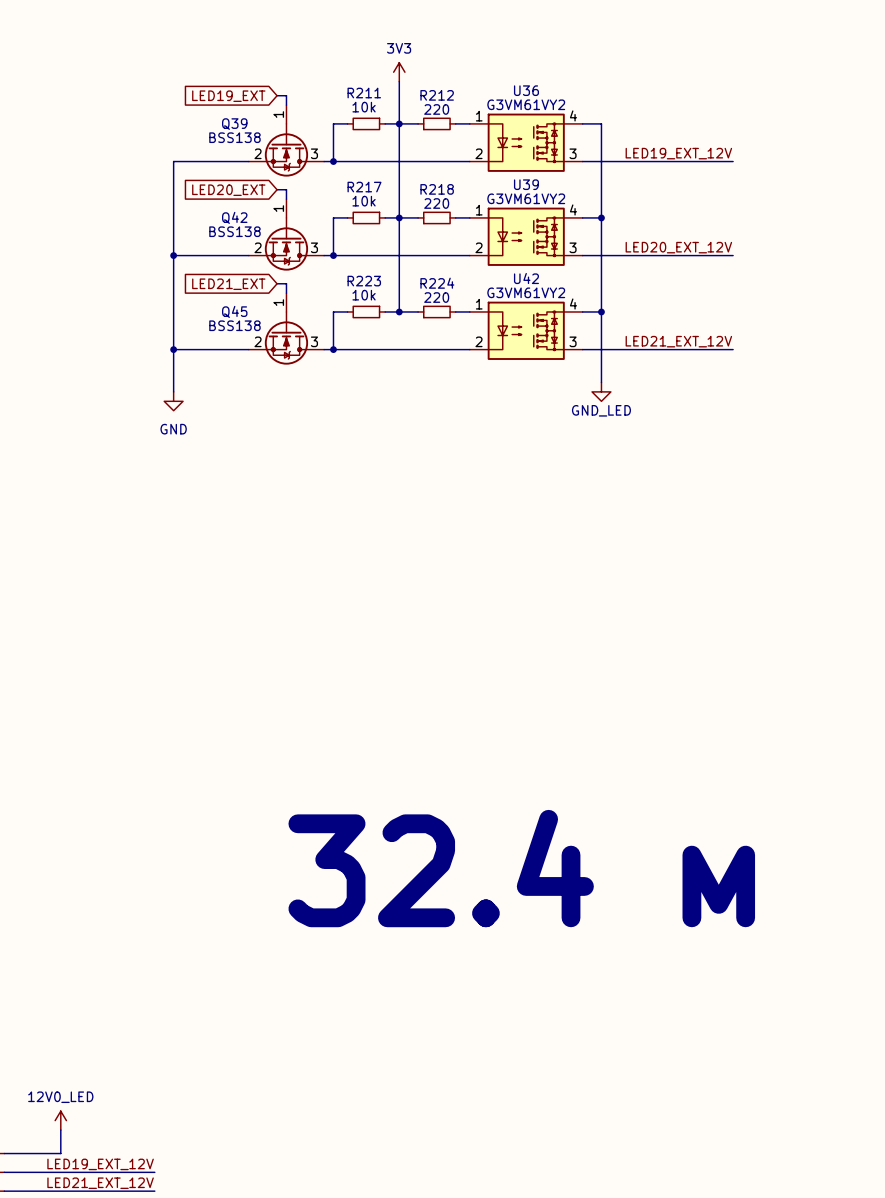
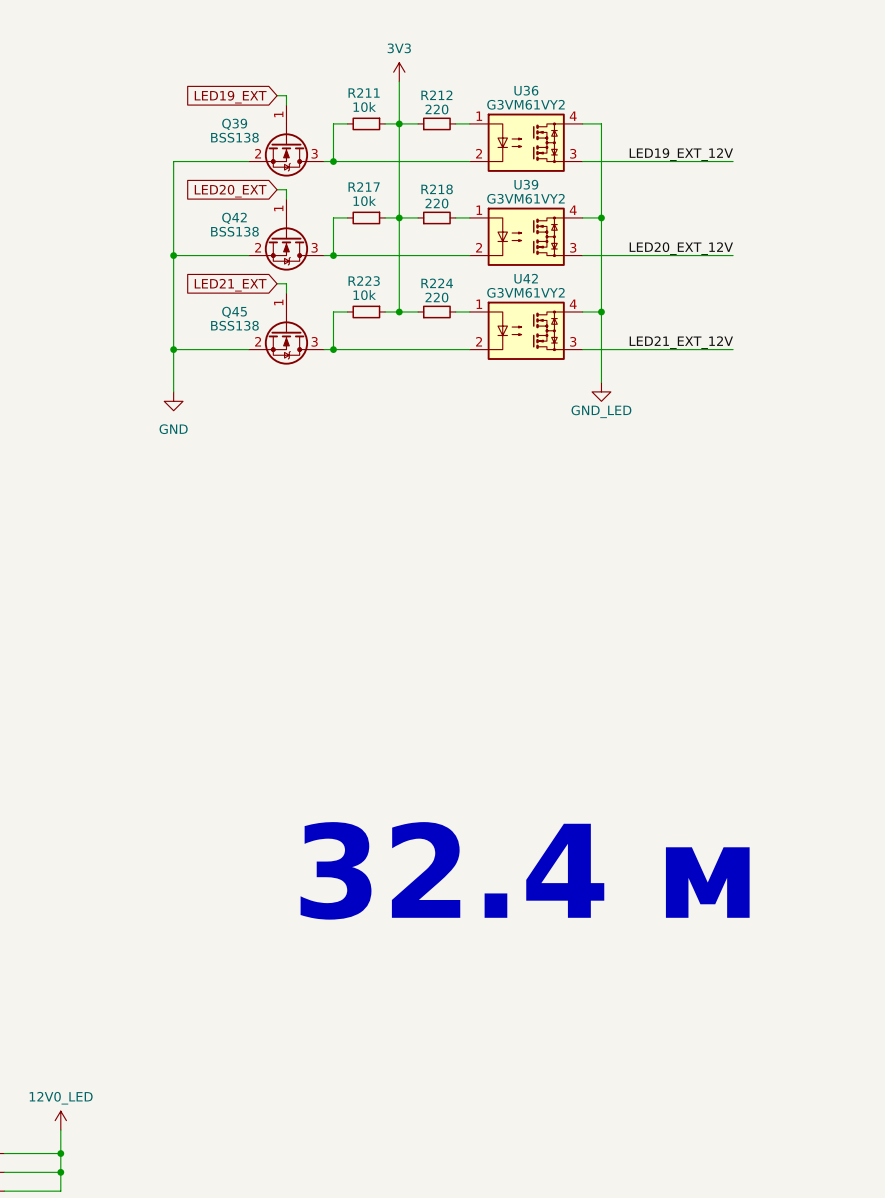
junction: none -> (60, 1153)
label: LED19_EXT_12V (100, 1164) -> none
wire: (60, 1172) (154, 1172) -> none
junction: none -> (60, 1172)
label: LED21_EXT_12V (100, 1183) -> none
wire: (60, 1191) (154, 1191) -> (60, 1191) (60, 1153)

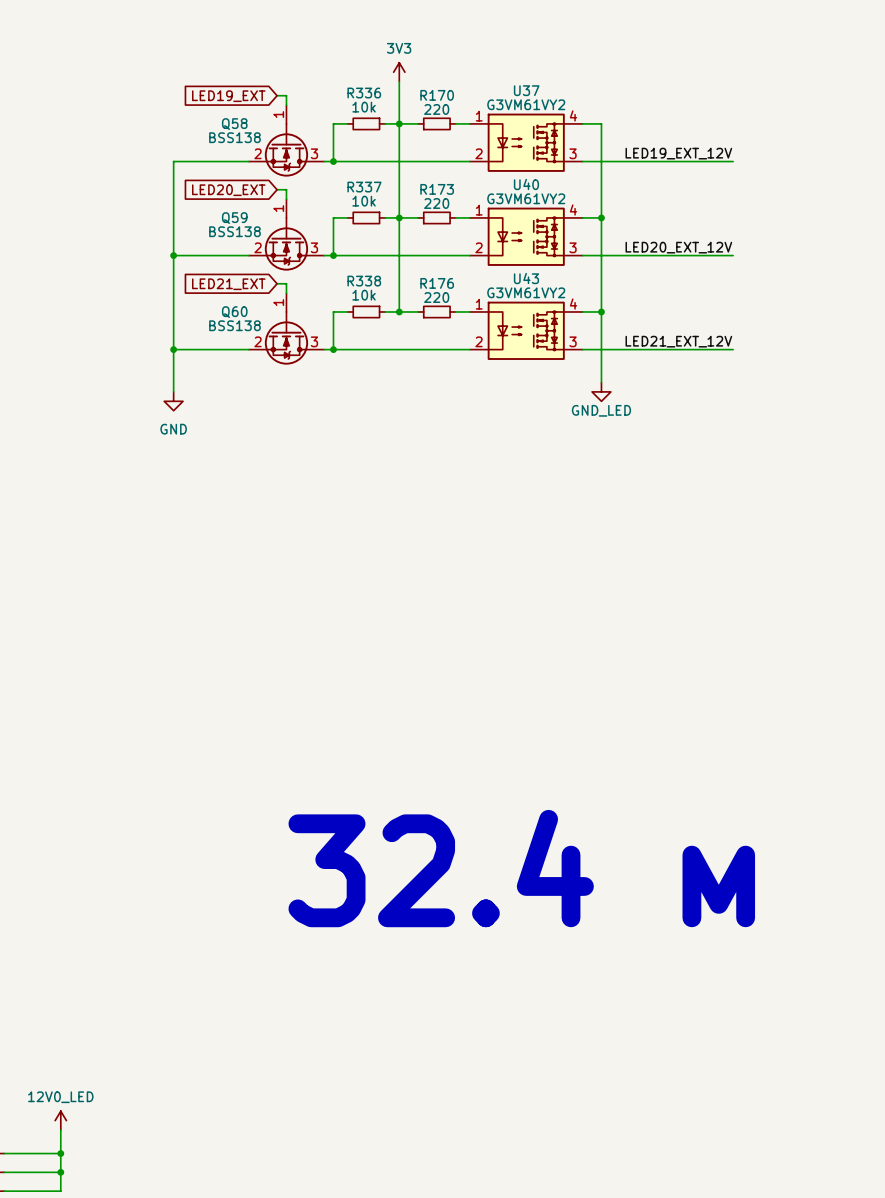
U36 name: U36 (526, 90) -> U37 (526, 90)
R211 name: R211 (364, 92) -> R336 (364, 93)
R212 name: R212 (436, 95) -> R170 (437, 95)
Q39 name: Q39 (234, 124) -> Q58 (234, 124)
U39 name: U39 (526, 184) -> U40 (526, 184)
R217 name: R217 (364, 186) -> R337 (364, 187)
R218 name: R218 (437, 189) -> R173 (437, 189)
Q42 name: Q42 (234, 218) -> Q59 (234, 218)
U42 name: U42 (526, 278) -> U43 (526, 278)
R223 name: R223 (364, 281) -> R338 (364, 281)
R224 name: R224 (437, 283) -> R176 (437, 283)
Q45 name: Q45 (234, 312) -> Q60 (234, 312)

